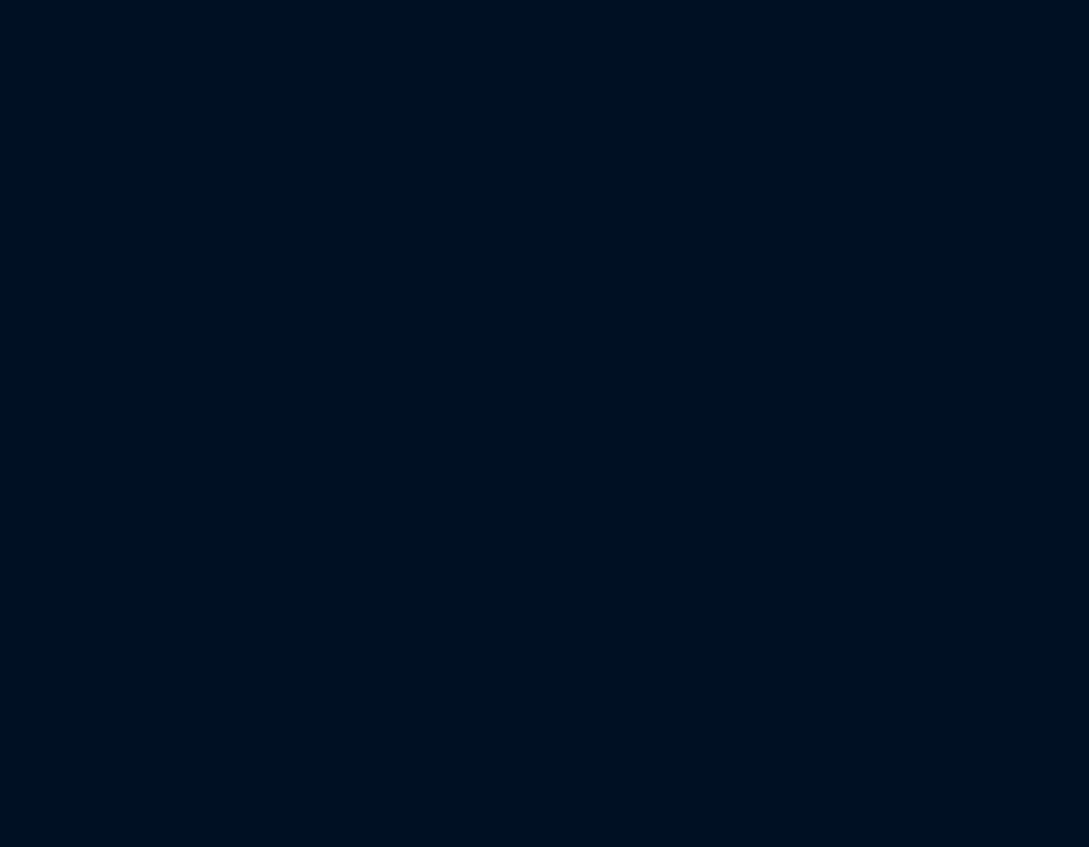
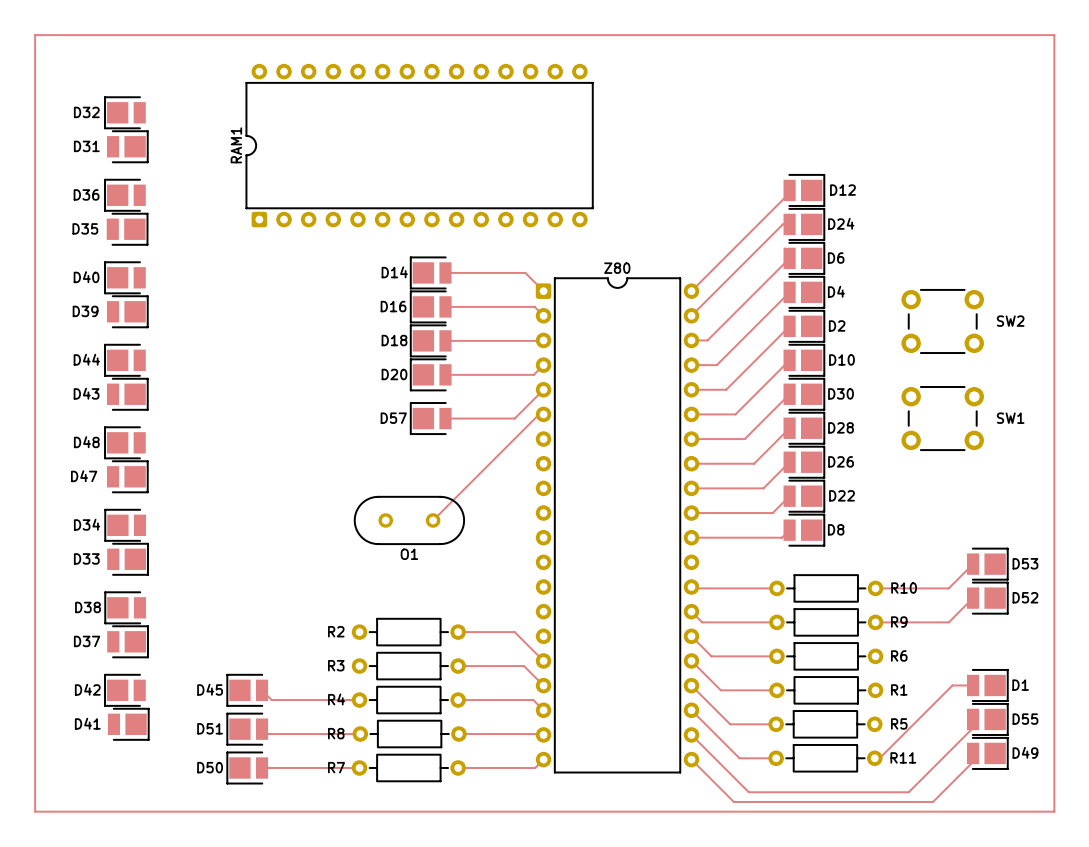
top track: none -> (35, 35) (1054, 35) (1054, 811) (35, 811) (35, 35)
D32: none -> (125, 112)
RAM1: none -> (419, 145)
D31: none -> (127, 146)
top track: none -> (789, 190) (789, 193) (691, 291)
D12: none -> (804, 190)
D36: none -> (125, 195)
top track: none -> (789, 224) (782, 224) (691, 315)
D24: none -> (804, 224)
D35: none -> (127, 229)
top track: none -> (789, 258) (707, 340) (691, 340)
D6: none -> (804, 258)
D14: none -> (430, 272)
top track: none -> (445, 272) (525, 272) (543, 291)
D40: none -> (125, 277)
top track: none -> (789, 292) (716, 365) (691, 365)
D4: none -> (804, 292)
D16: none -> (430, 306)
top track: none -> (445, 306) (534, 306) (543, 315)
D39: none -> (127, 311)
SW2: none -> (942, 321)
top track: none -> (789, 326) (726, 389) (691, 389)
D2: none -> (804, 326)
D18: none -> (430, 340)
top track: none -> (543, 340) (445, 340)
D44: none -> (125, 360)
top track: none -> (789, 360) (735, 414) (691, 414)
D10: none -> (804, 360)
top track: none -> (543, 365) (533, 374) (445, 374)
D20: none -> (430, 374)
top track: none -> (543, 389) (514, 418) (445, 418)
D43: none -> (127, 394)
top track: none -> (789, 394) (744, 439) (691, 439)
D30: none -> (804, 394)
top track: none -> (543, 414) (539, 414) (433, 520)
D57: none -> (430, 418)
SW1: none -> (942, 418)
top track: none -> (789, 428) (754, 463) (691, 463)
D28: none -> (804, 428)
D48: none -> (125, 442)
top track: none -> (789, 462) (763, 488) (691, 488)
D26: none -> (804, 462)
D47: none -> (127, 476)
top track: none -> (789, 496) (772, 513) (691, 513)
D22: none -> (804, 496)
O1: none -> (409, 520)
D34: none -> (125, 525)
Z80: none -> (617, 525)
top track: none -> (789, 530) (782, 537) (691, 537)
D8: none -> (804, 530)
D33: none -> (127, 559)
top track: none -> (973, 564) (948, 588) (875, 588)
D53: none -> (987, 564)
top track: none -> (691, 587) (776, 588)
R10: none -> (826, 588)
top track: none -> (973, 598) (948, 622) (875, 622)
D52: none -> (987, 598)
D38: none -> (125, 607)
top track: none -> (691, 611) (702, 622) (776, 622)
R9: none -> (826, 622)
R2: none -> (408, 632)
top track: none -> (458, 632) (514, 632) (543, 660)
top track: none -> (691, 636) (711, 656) (776, 656)
D37: none -> (127, 641)
R6: none -> (826, 656)
top track: none -> (691, 660) (720, 690) (776, 690)
R3: none -> (408, 666)
top track: none -> (458, 666) (524, 666) (543, 685)
top track: none -> (691, 685) (730, 724) (776, 724)
top track: none -> (973, 685) (952, 685) (879, 758) (874, 758)
D1: none -> (987, 685)
D42: none -> (125, 690)
D45: none -> (247, 690)
top track: none -> (262, 690) (271, 700) (359, 700)
R1: none -> (826, 690)
R4: none -> (408, 700)
top track: none -> (458, 700) (533, 700) (543, 710)
top track: none -> (691, 710) (739, 758) (776, 758)
top track: none -> (973, 719) (973, 727) (908, 792) (748, 792) (691, 734)
D55: none -> (987, 719)
D41: none -> (128, 724)
R5: none -> (825, 724)
D51: none -> (247, 729)
top track: none -> (262, 729) (266, 734) (360, 734)
R8: none -> (409, 734)
top track: none -> (458, 734) (543, 734)
top track: none -> (973, 753) (973, 761) (933, 801) (733, 801) (691, 759)
D49: none -> (987, 753)
R11: none -> (825, 758)
top track: none -> (543, 759) (535, 767) (458, 767)
D50: none -> (247, 767)
top track: none -> (262, 767) (359, 767)
R7: none -> (408, 767)

